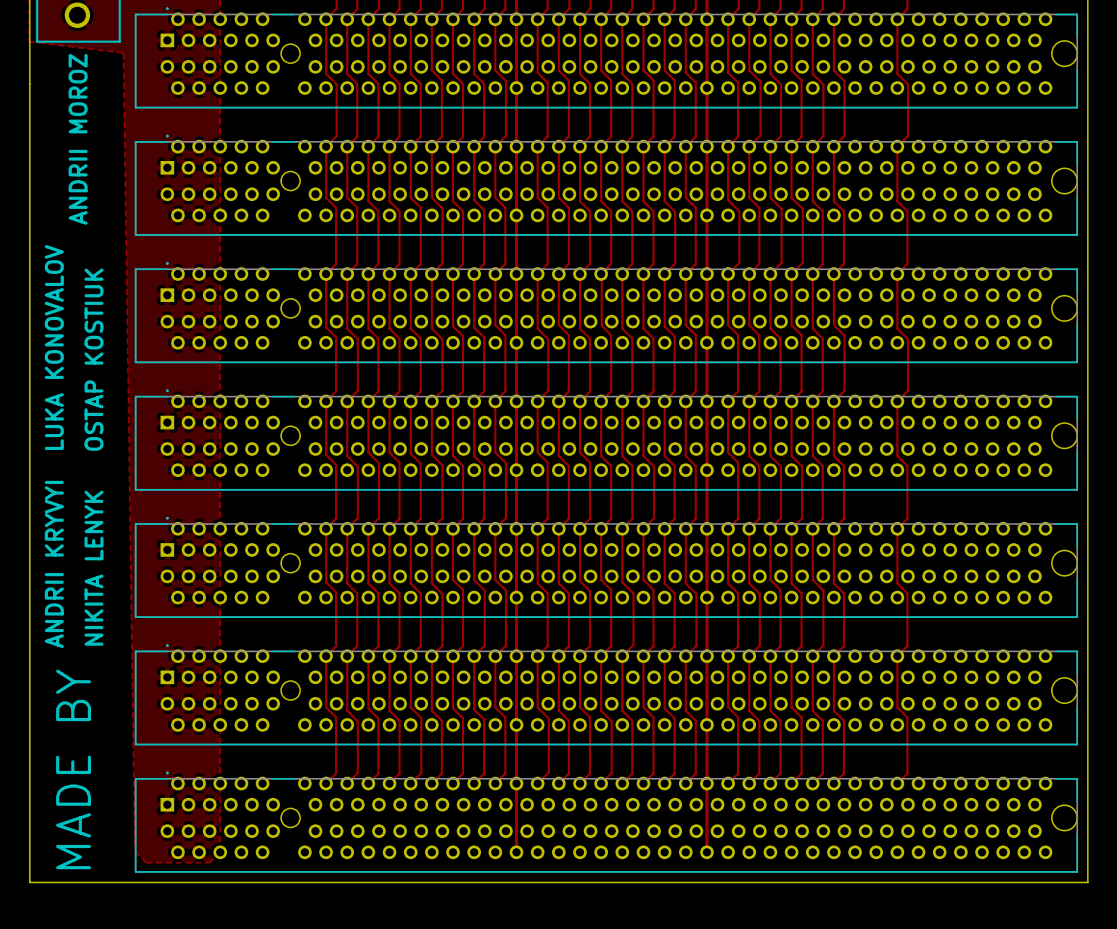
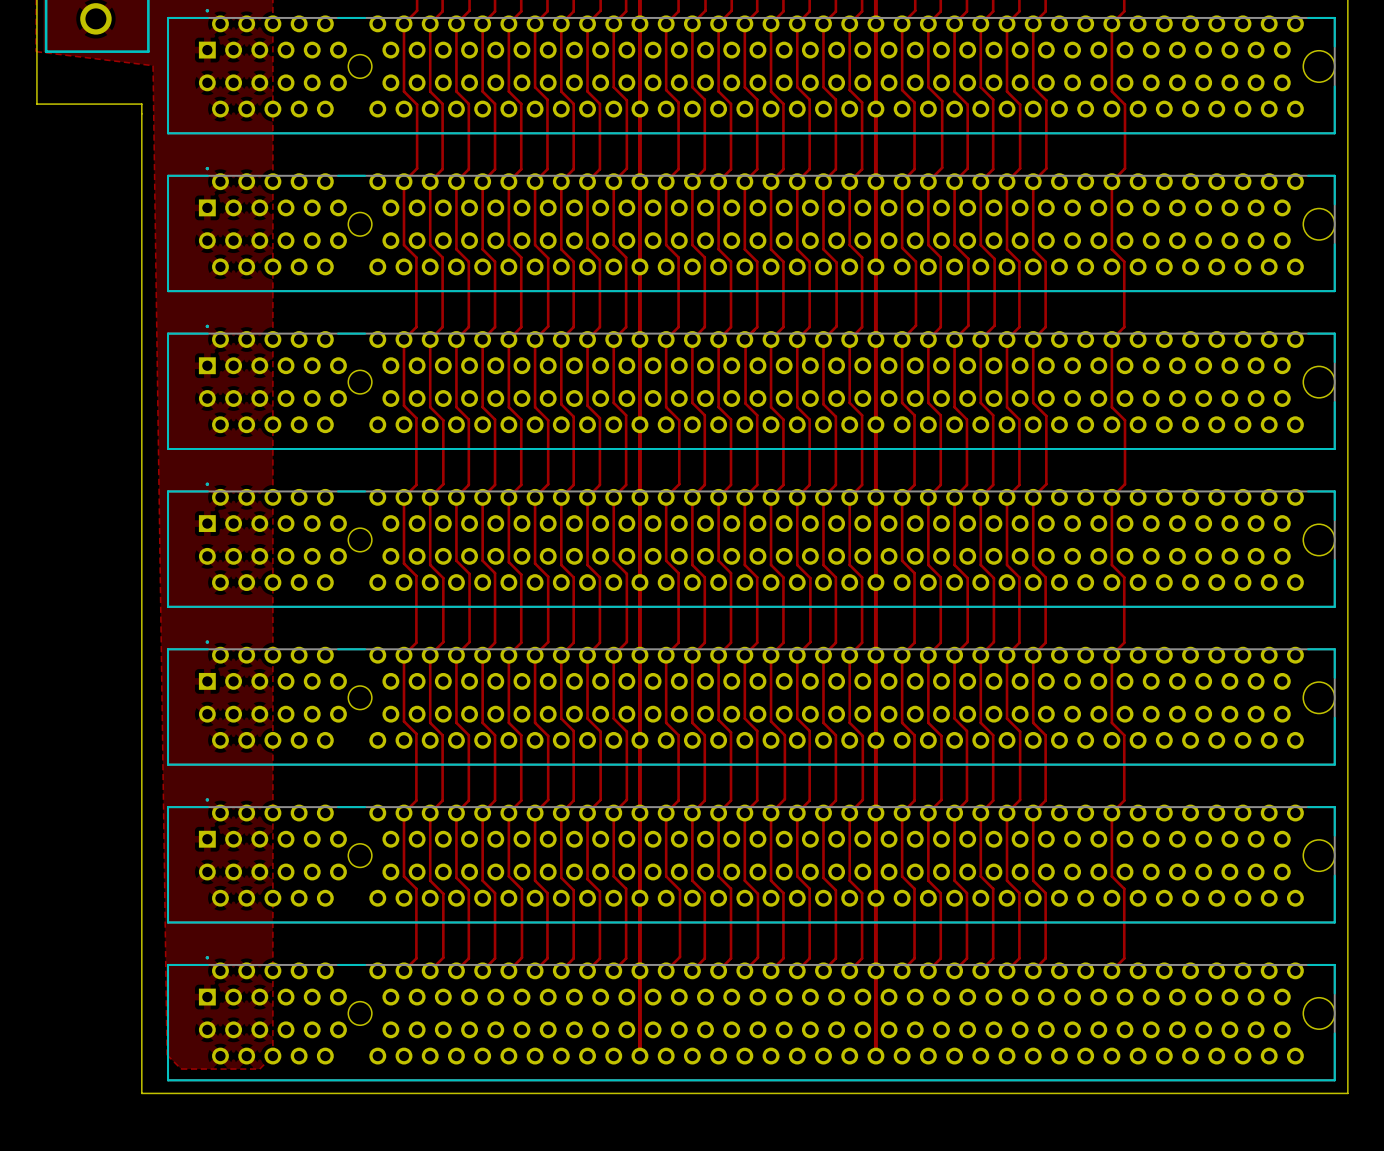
board edge: (29, 84) (29, 882) (114, 882) -> (36, 104) (141, 104) (141, 1093)
text: ANDRII MOROZ (78, 139) -> none
text: LUKA KONOVALOV (54, 347) -> none
text: OSTAP KOSTIUK (94, 359) -> none
text: ANDRII KRYVYI (54, 564) -> none
text: NIKITA LENYK (94, 568) -> none
text: MADE BY (73, 769) -> none

